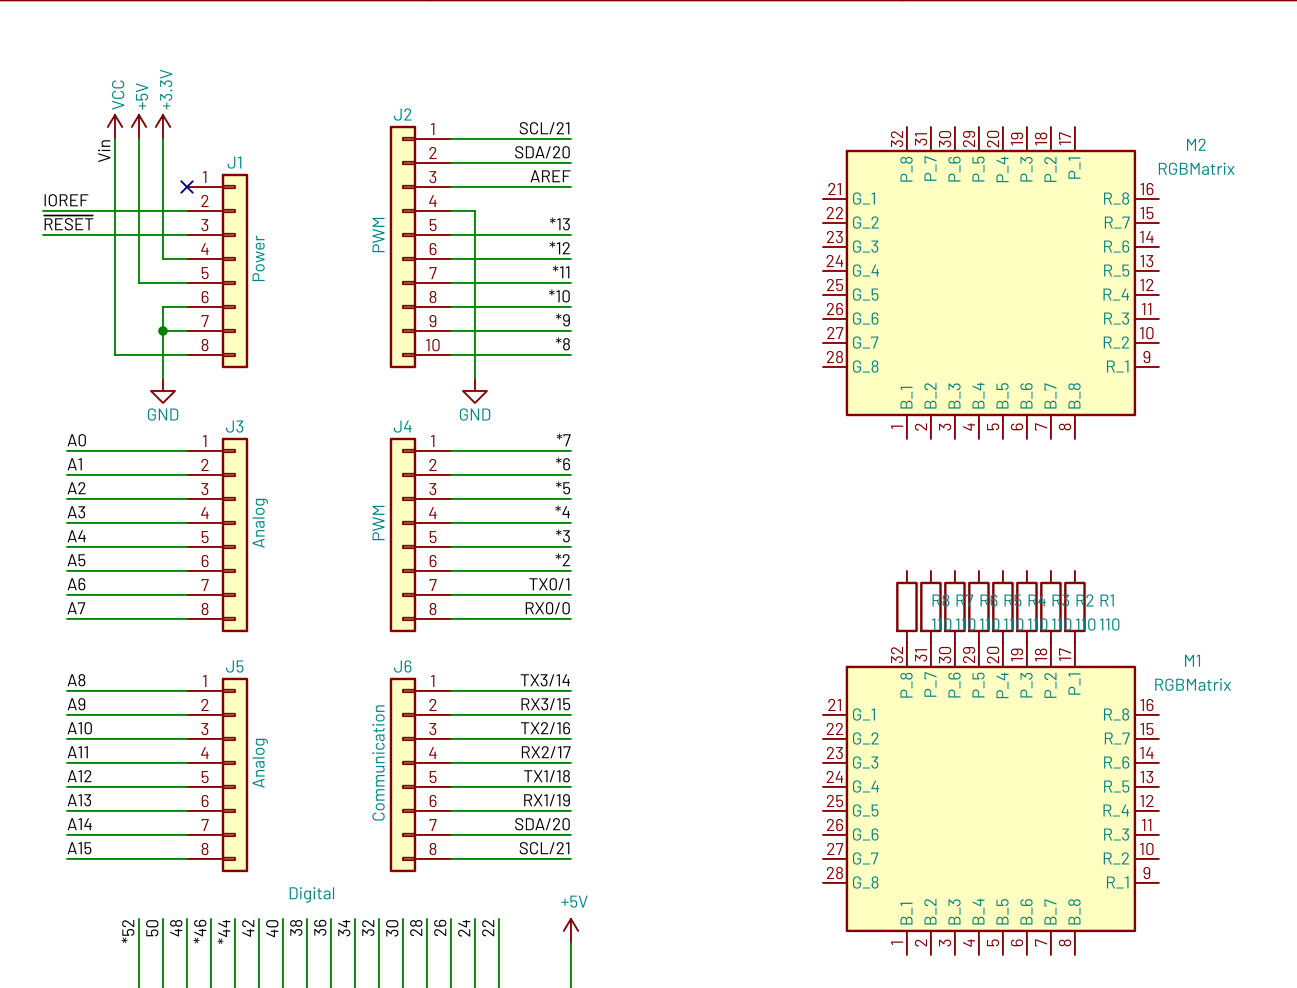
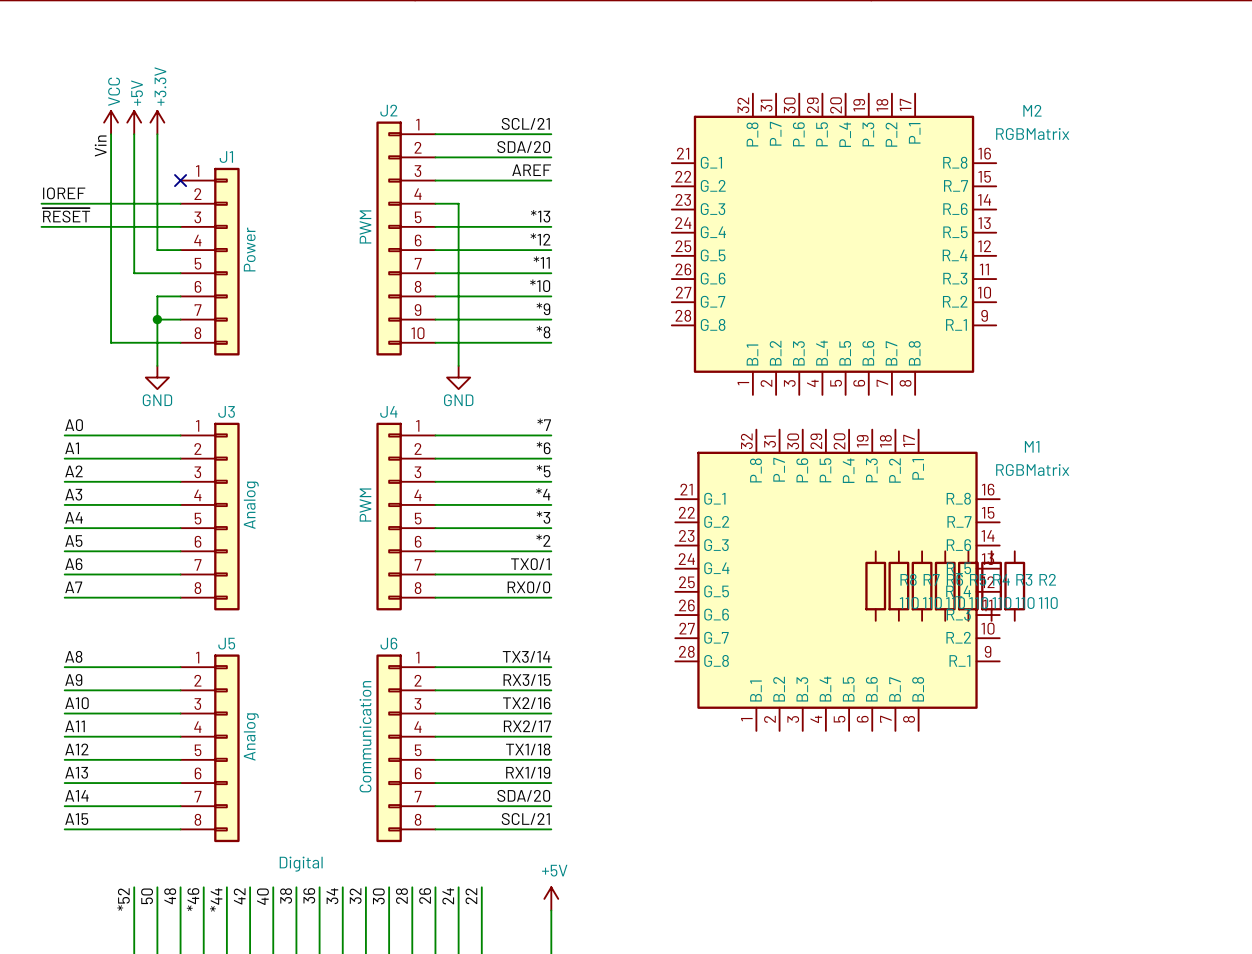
M2 position: (990, 282) -> (834, 244)
R1: 110 (1074, 606) -> none
M1 position: (990, 798) -> (837, 580)

